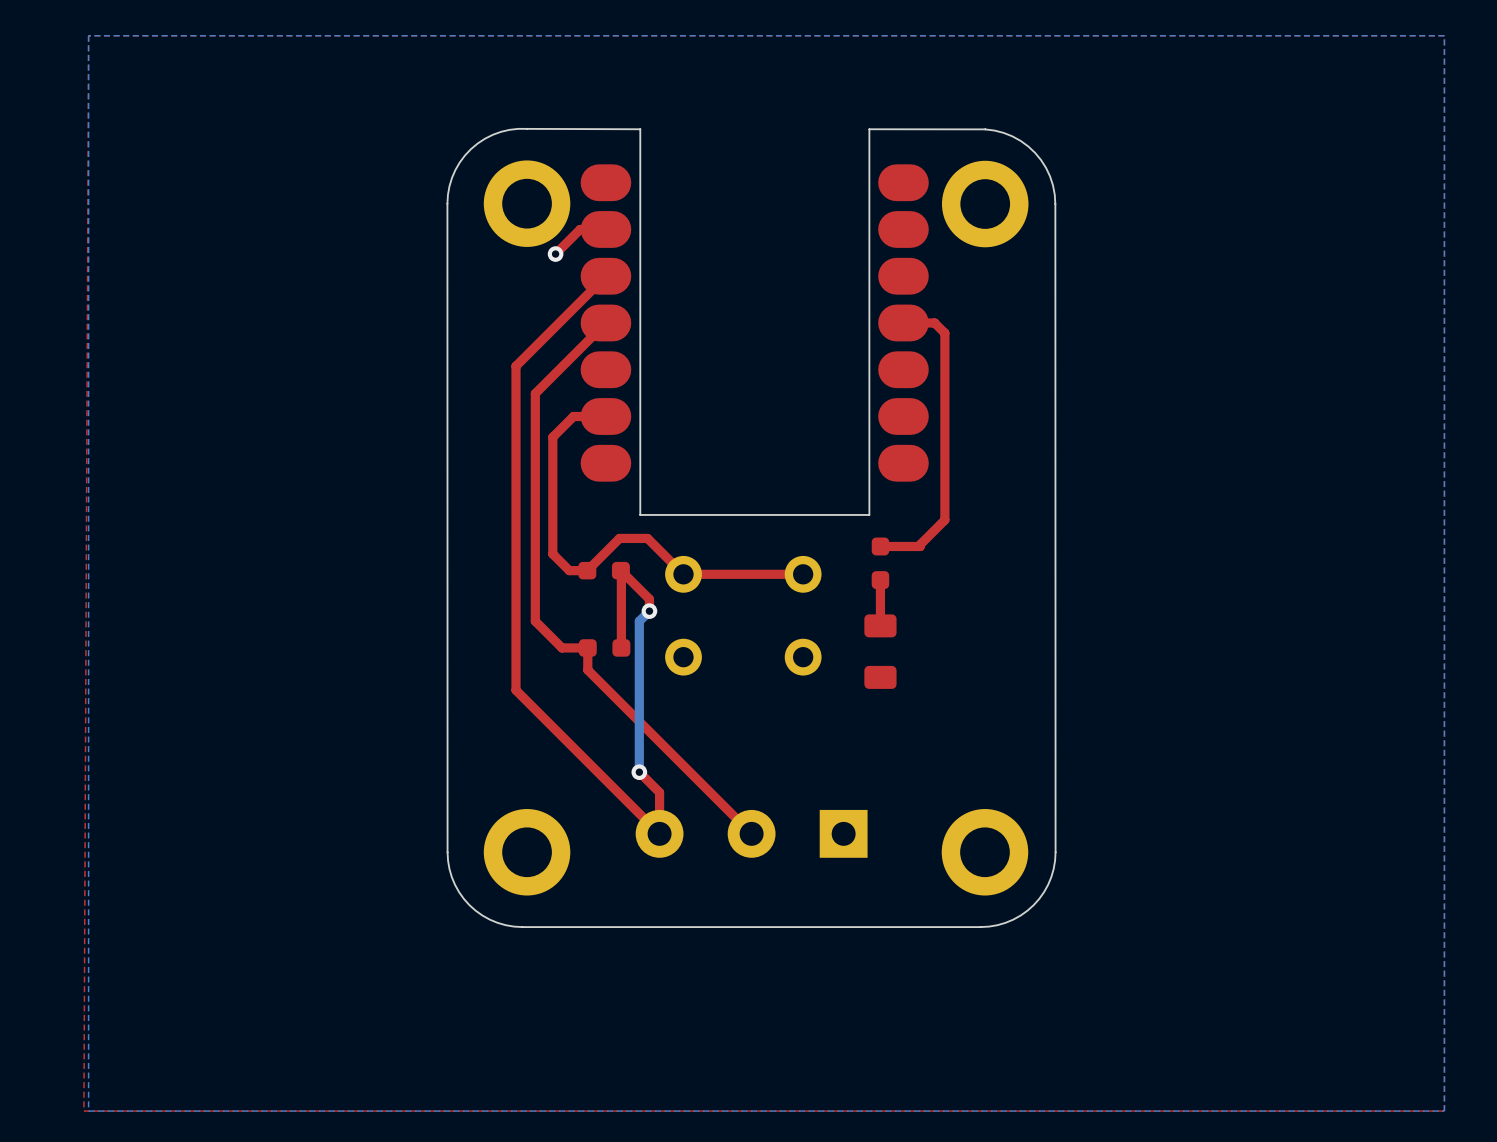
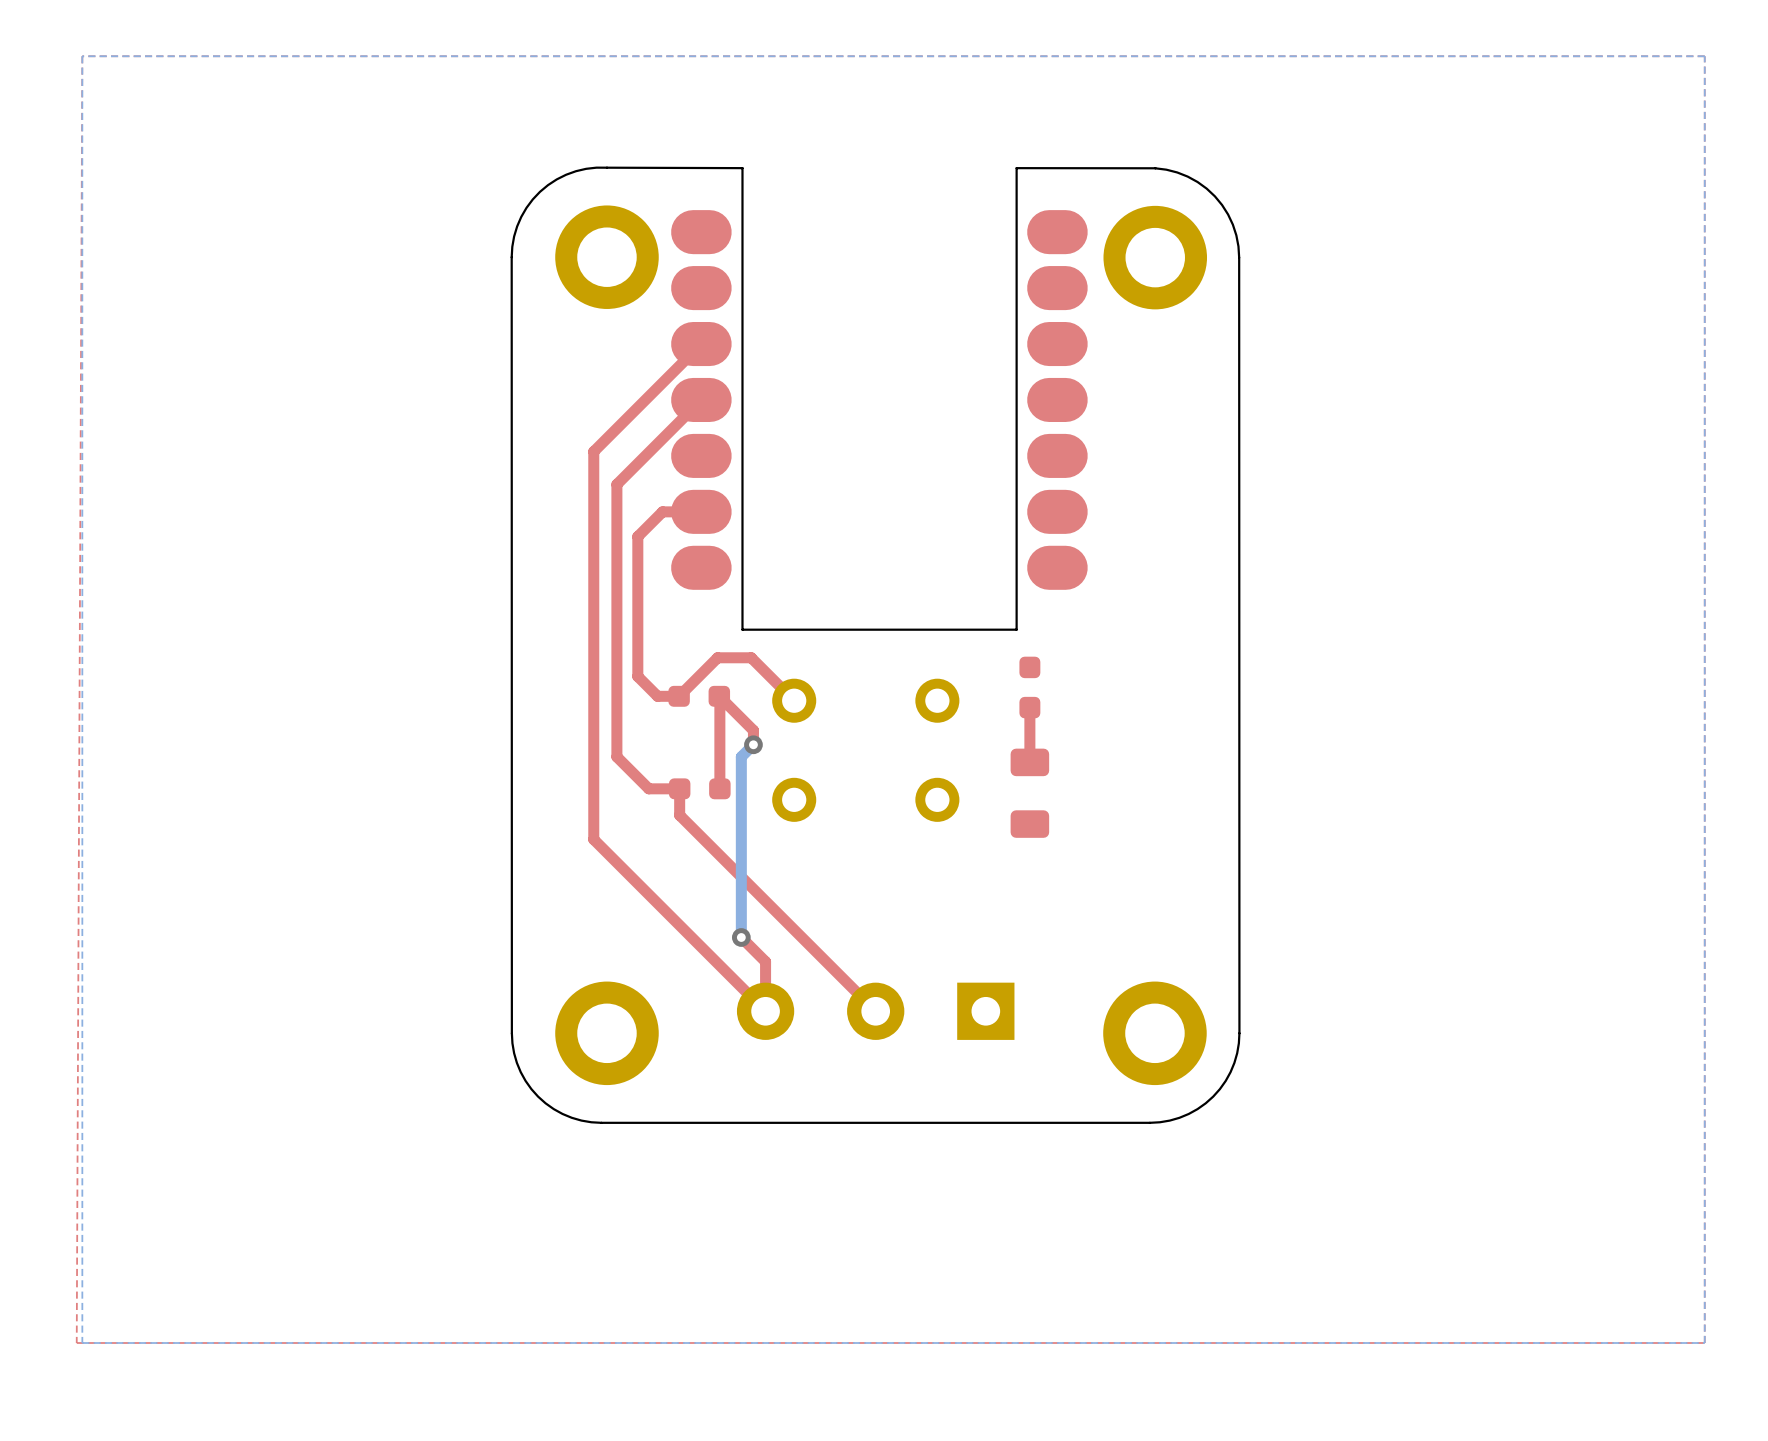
top track: (605, 229) (580, 229) (555, 254) -> none
via: (555, 254) -> none
top track: (903, 322) (934, 322) (944, 333) (944, 520) (920, 546) (880, 546) -> none
top track: (803, 574) (683, 574) -> none

